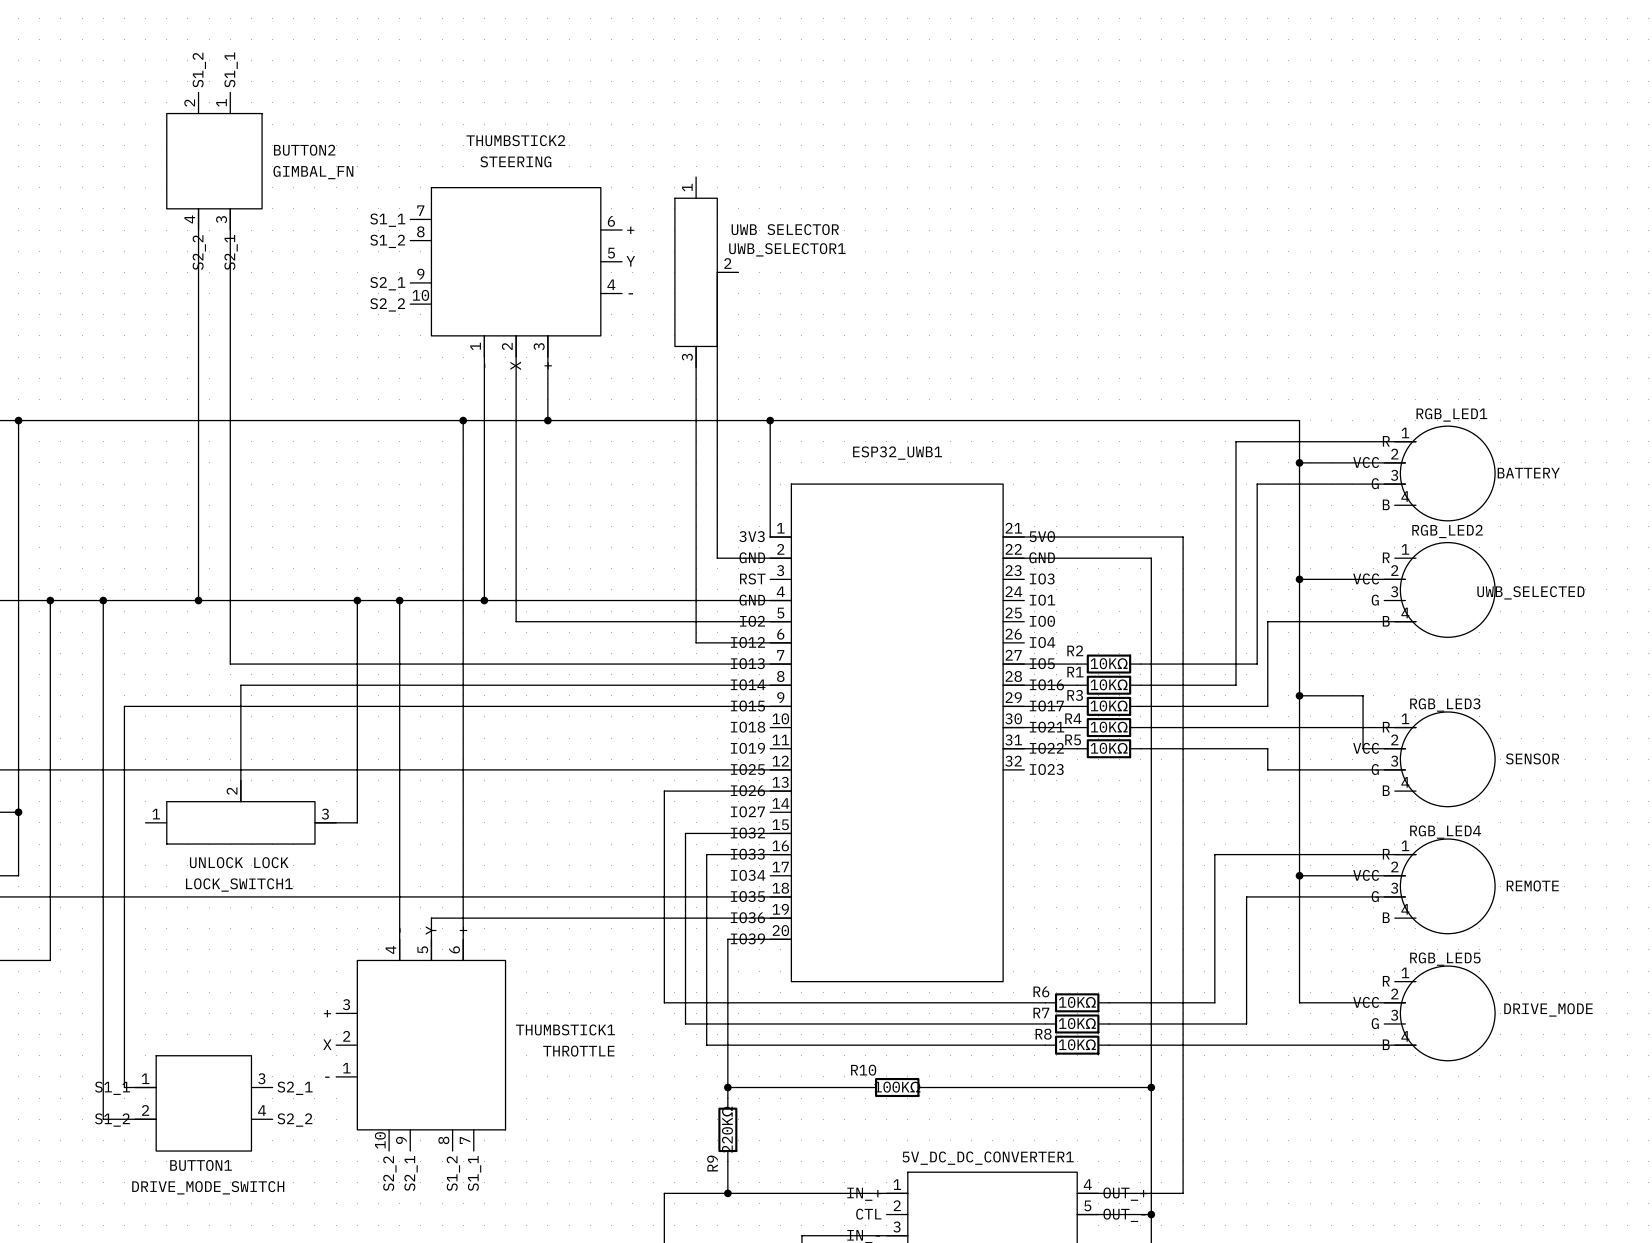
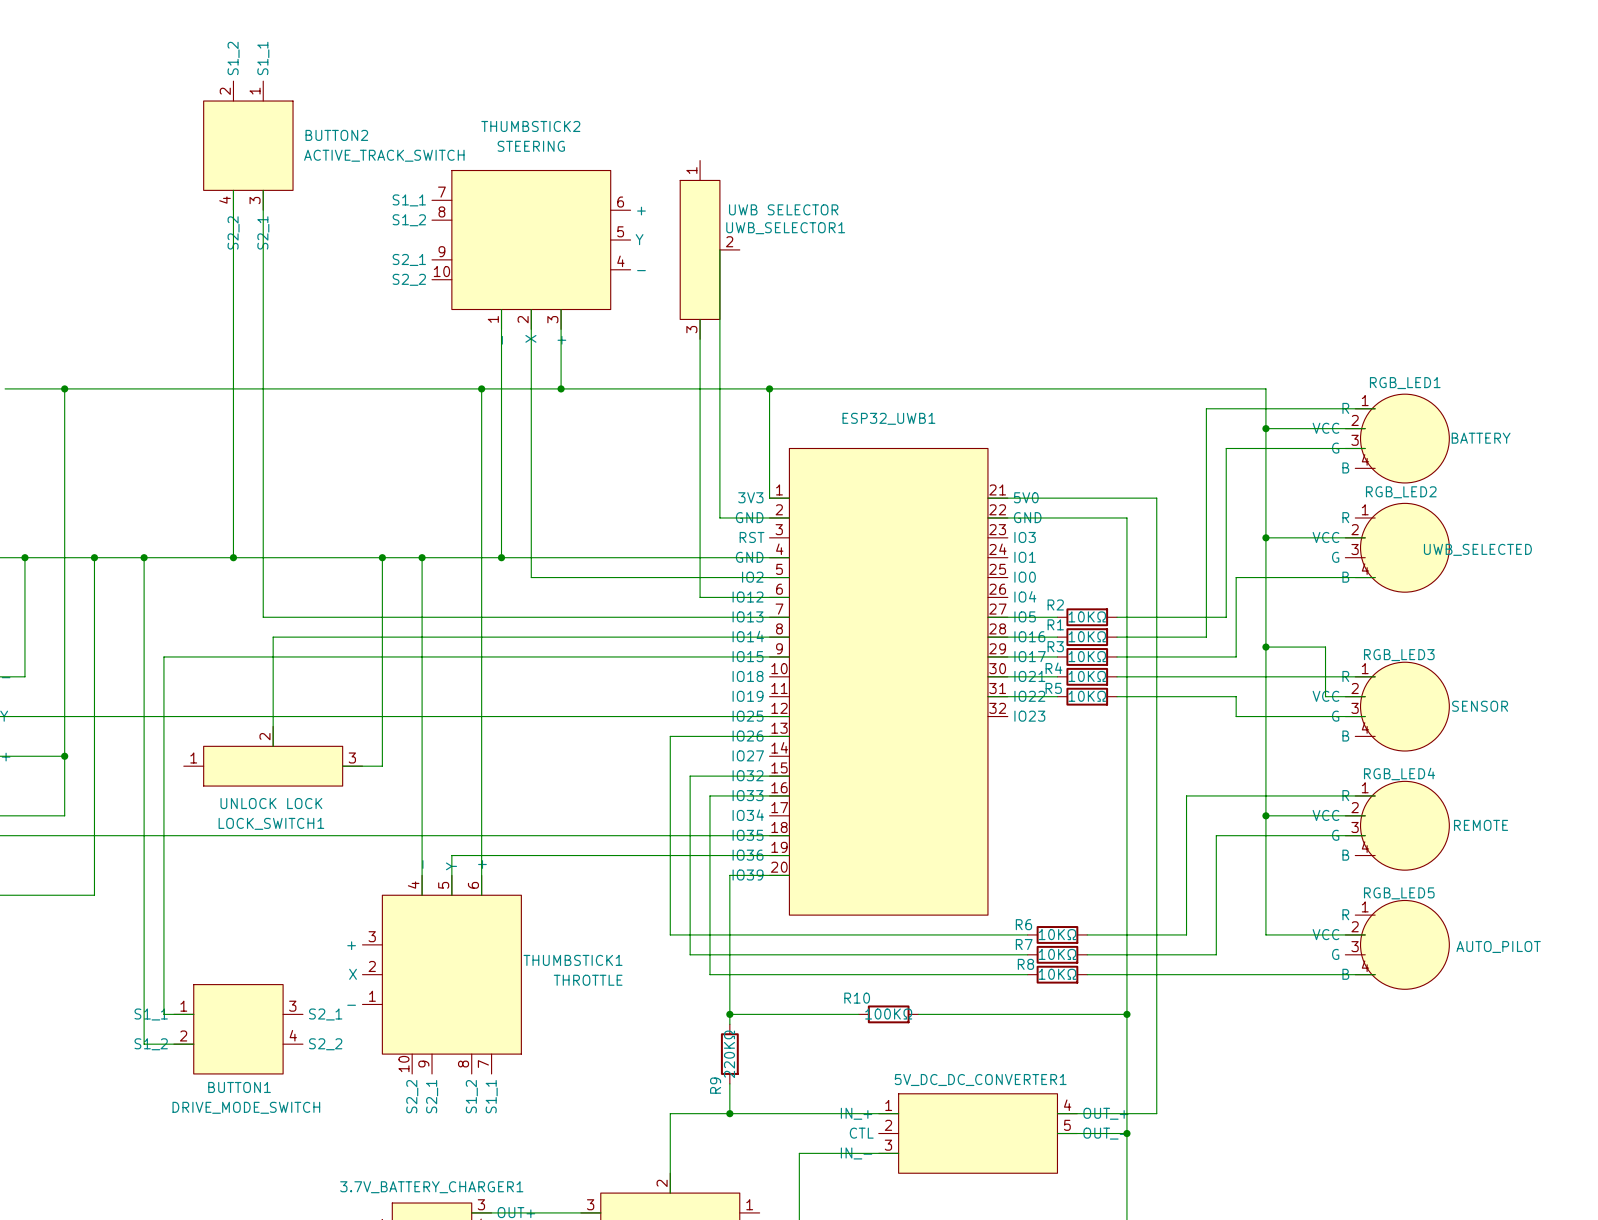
BUTTON2 value: GIMBAL_FN (313, 172) -> ACTIVE_TRACK_SWITCH (384, 155)
RGB_LED5 value: DRIVE_MODE (1548, 1009) -> AUTO_PILOT (1498, 946)

